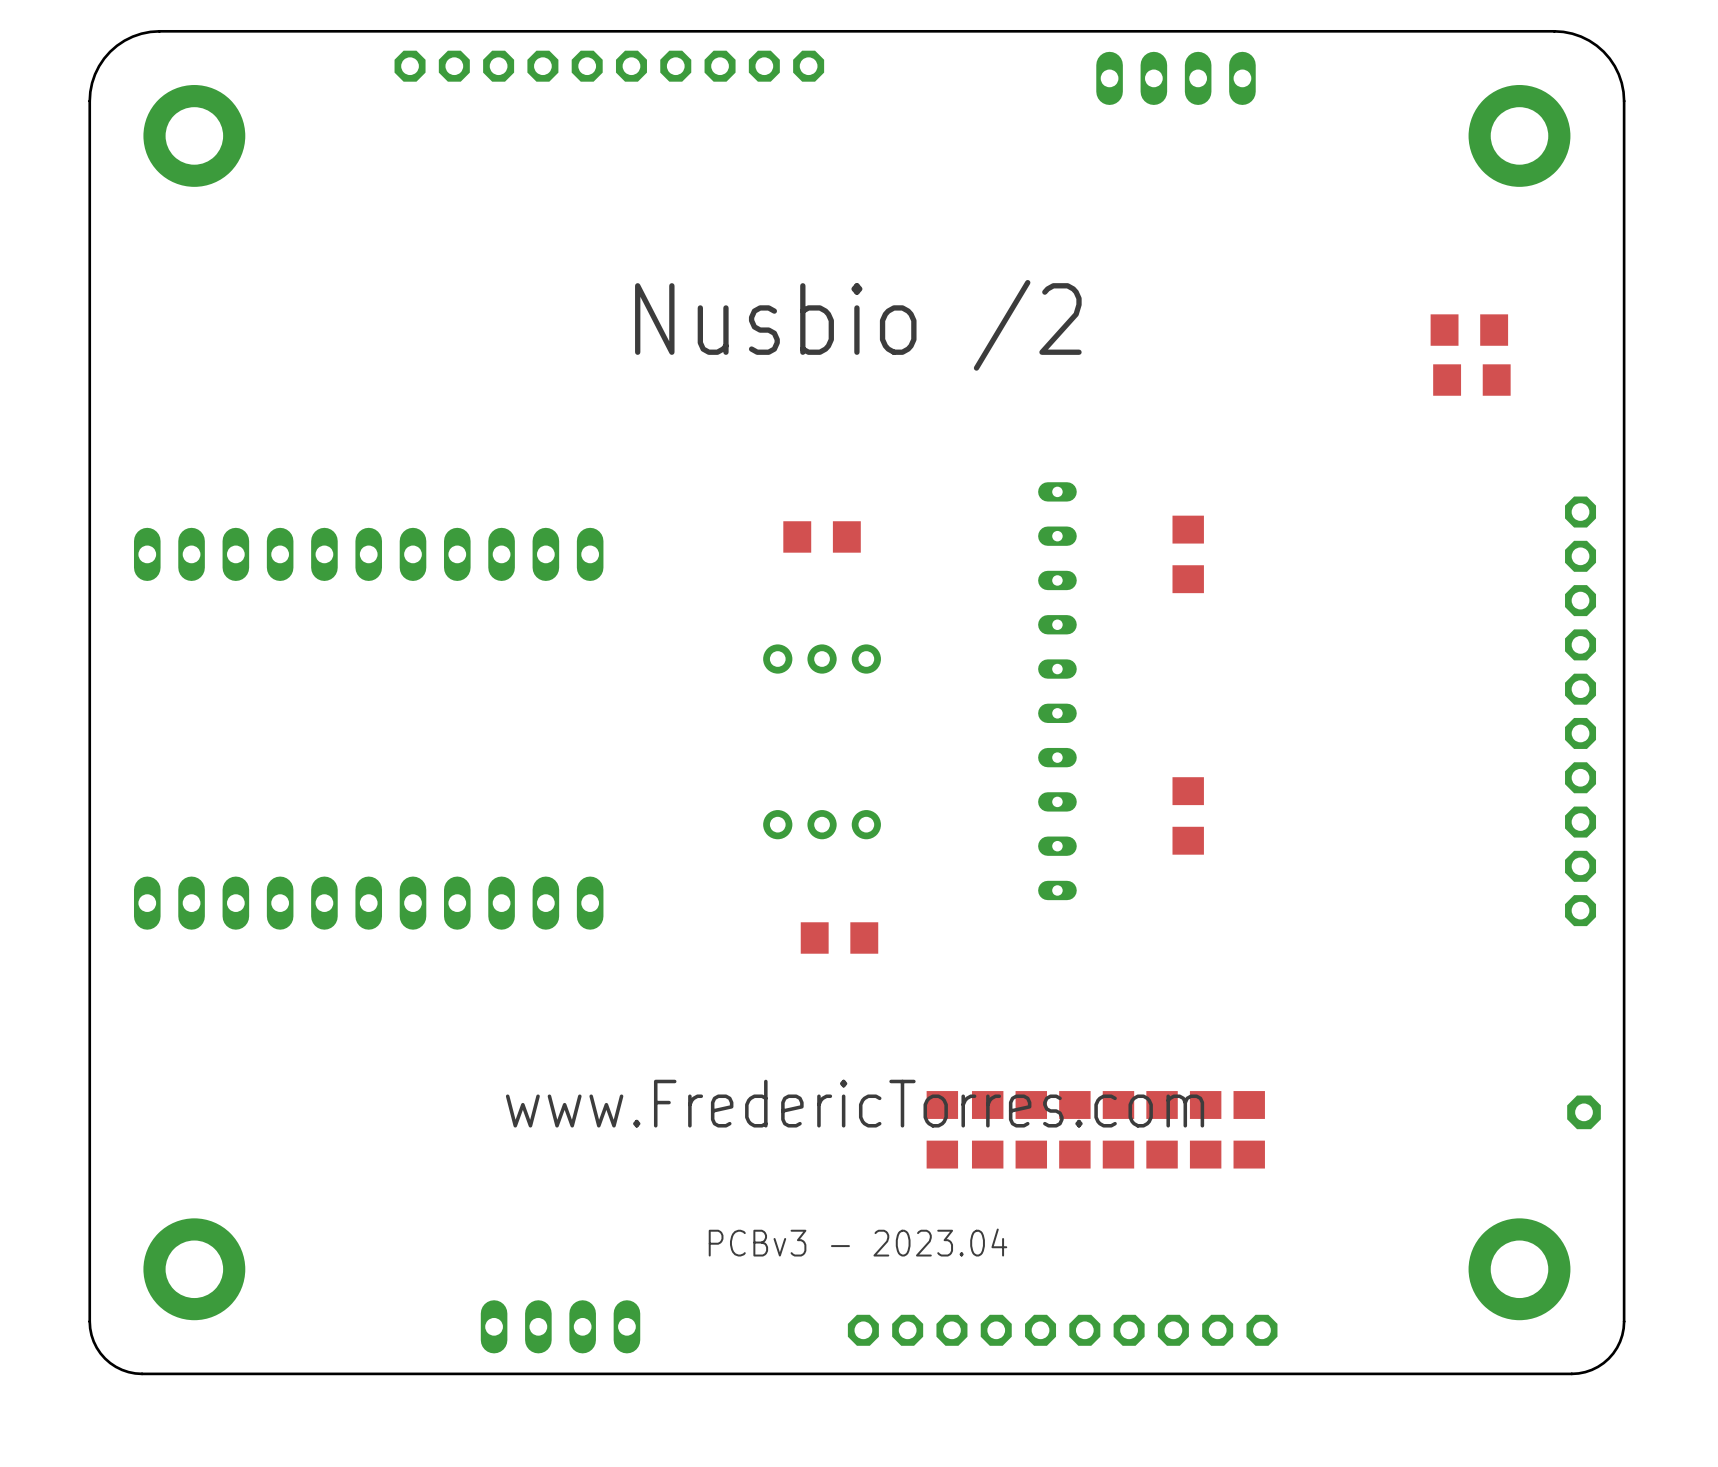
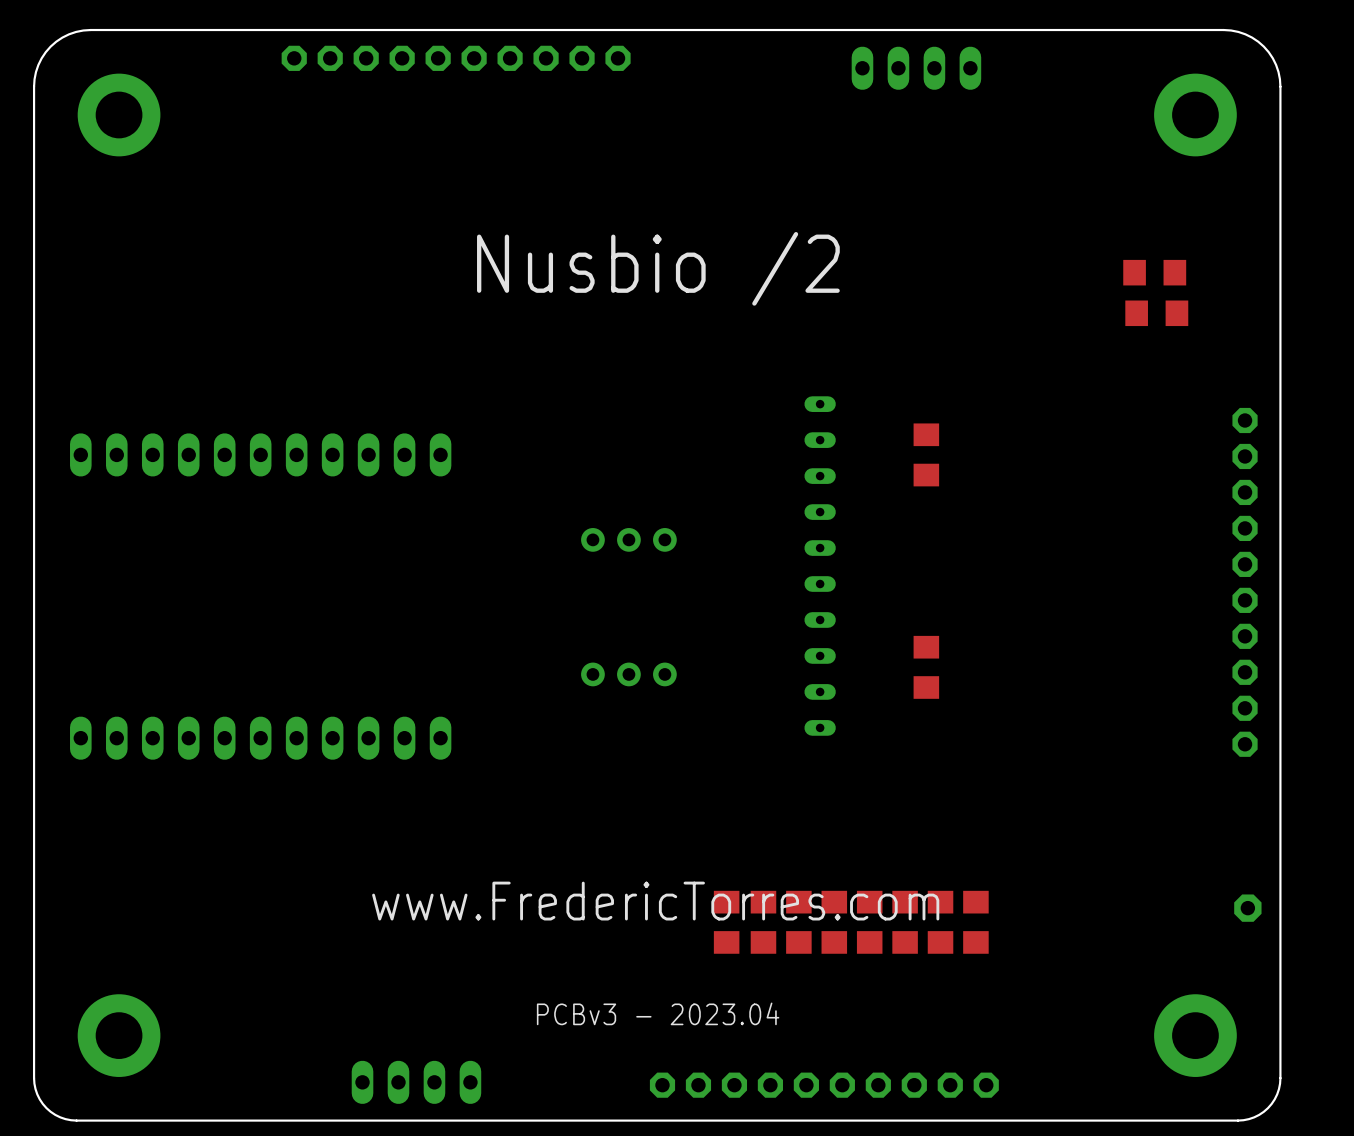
part: (822, 536) -> none
part: (839, 937) -> none

